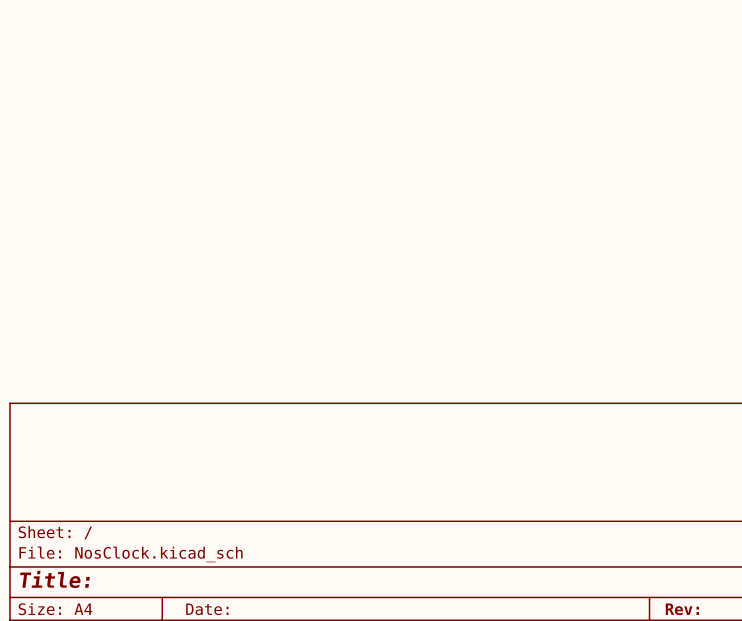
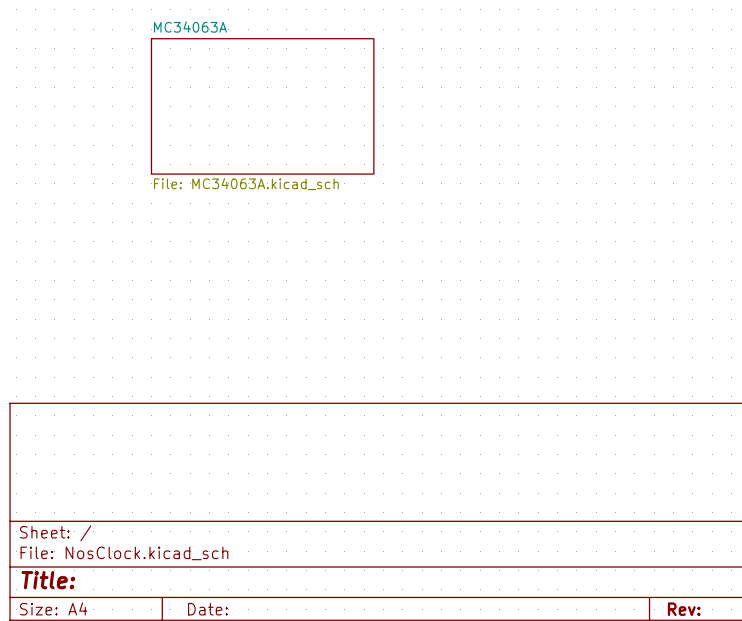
sheet MC34063A: none -> File: MC34063A.kicad_sch (262, 106)

